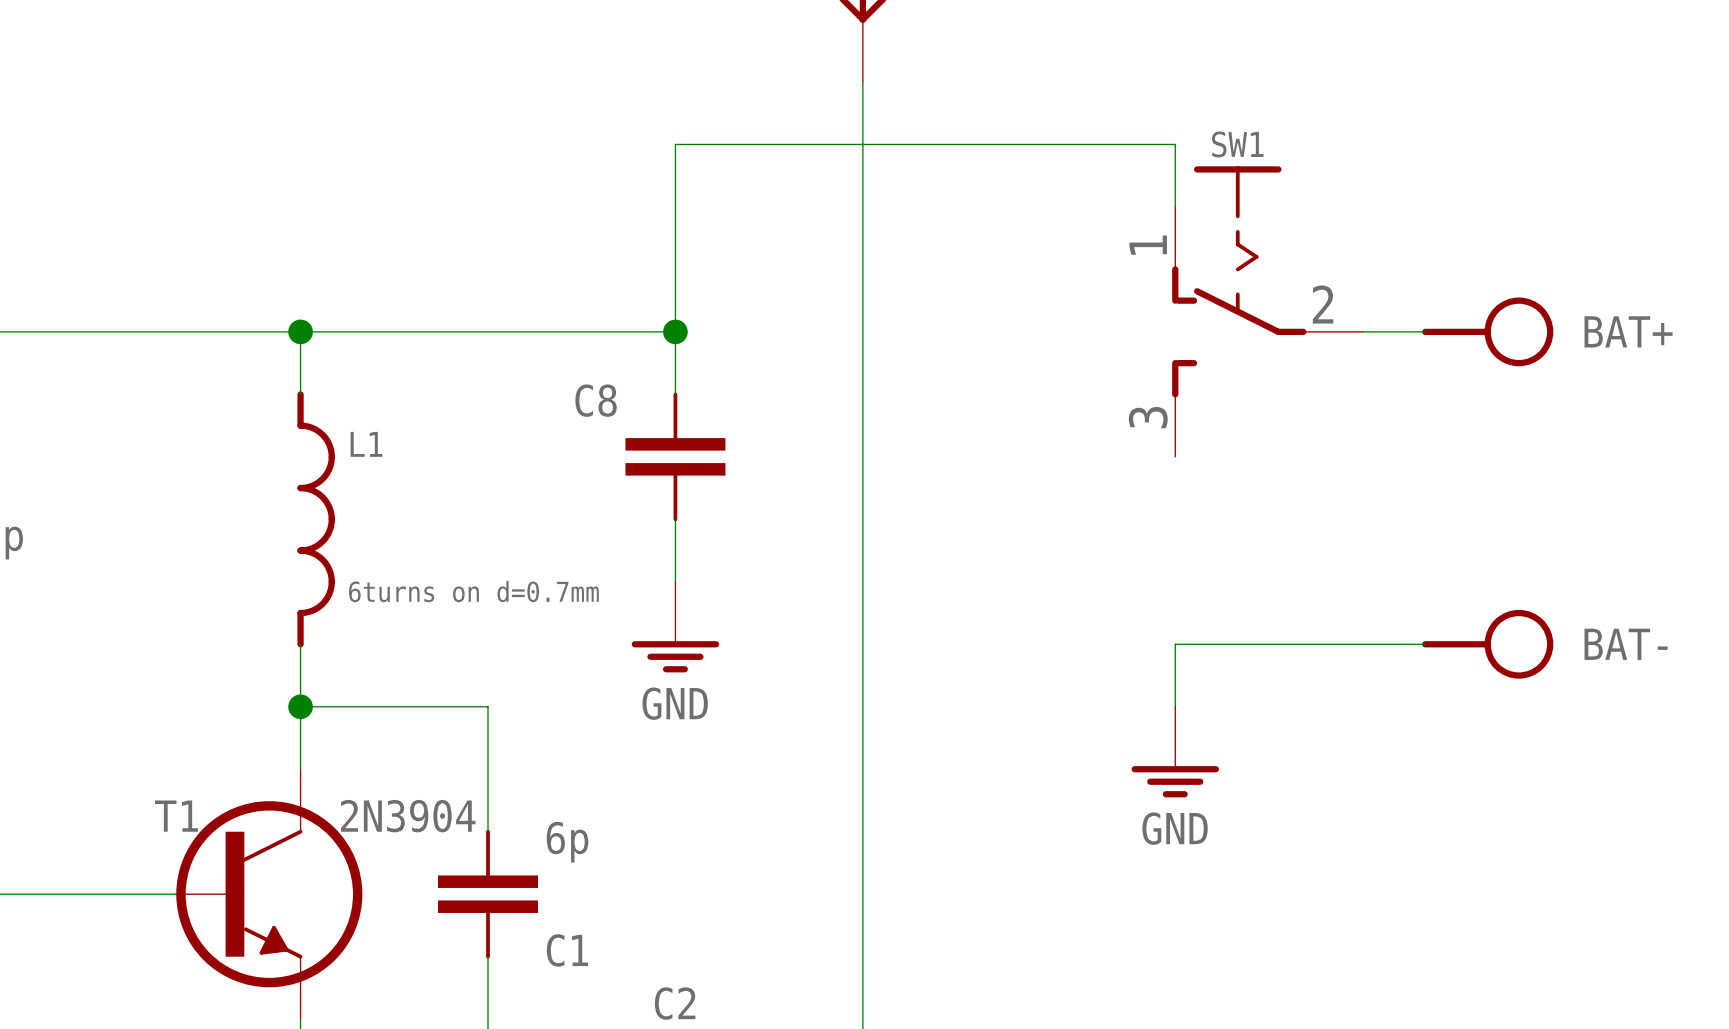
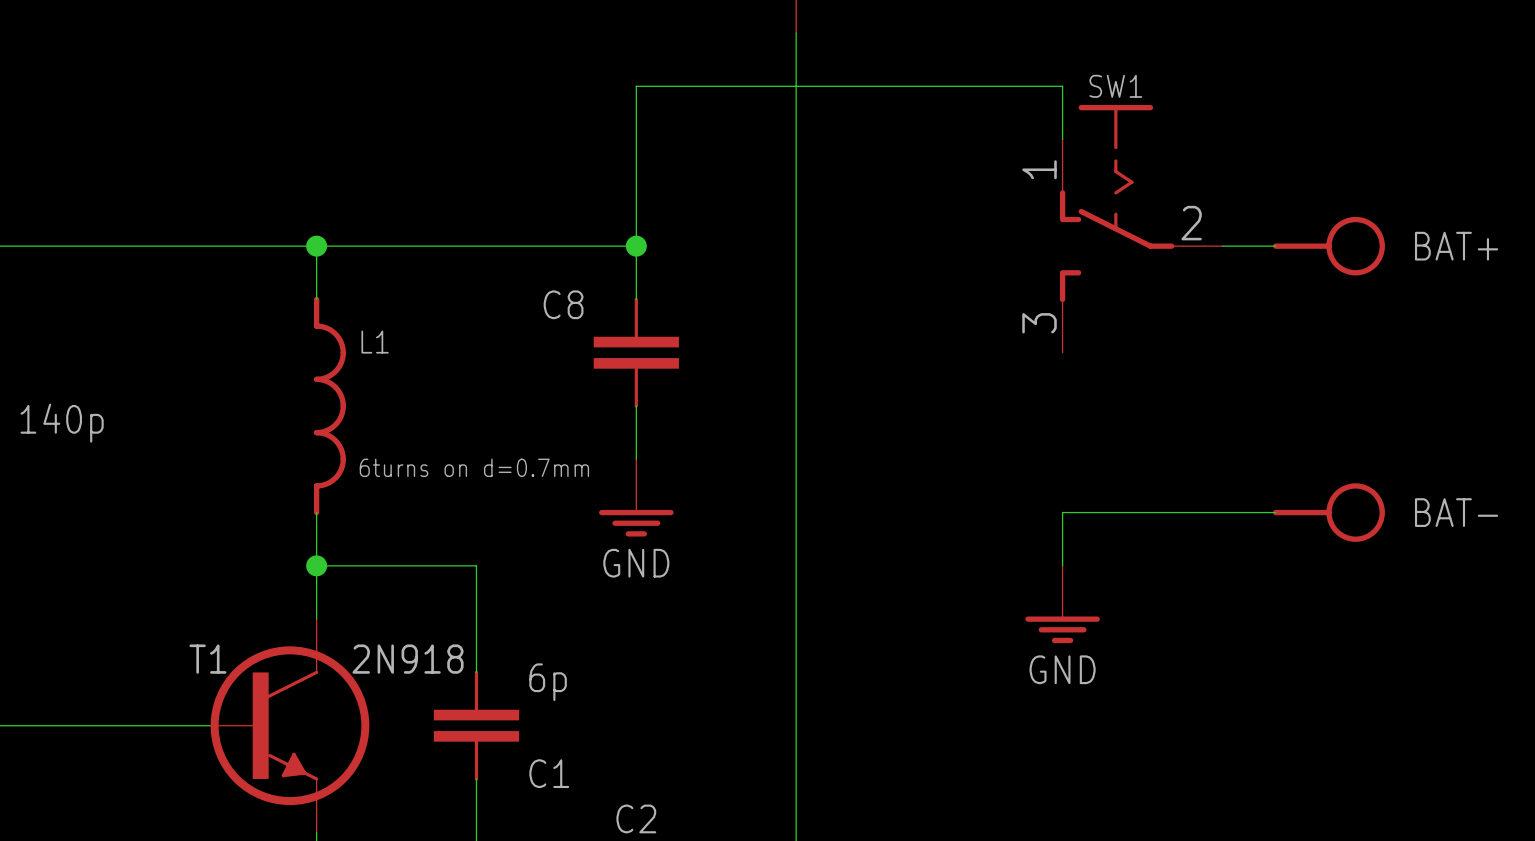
T1 value: 2N3904 (408, 816) -> 2N918 (408, 659)

